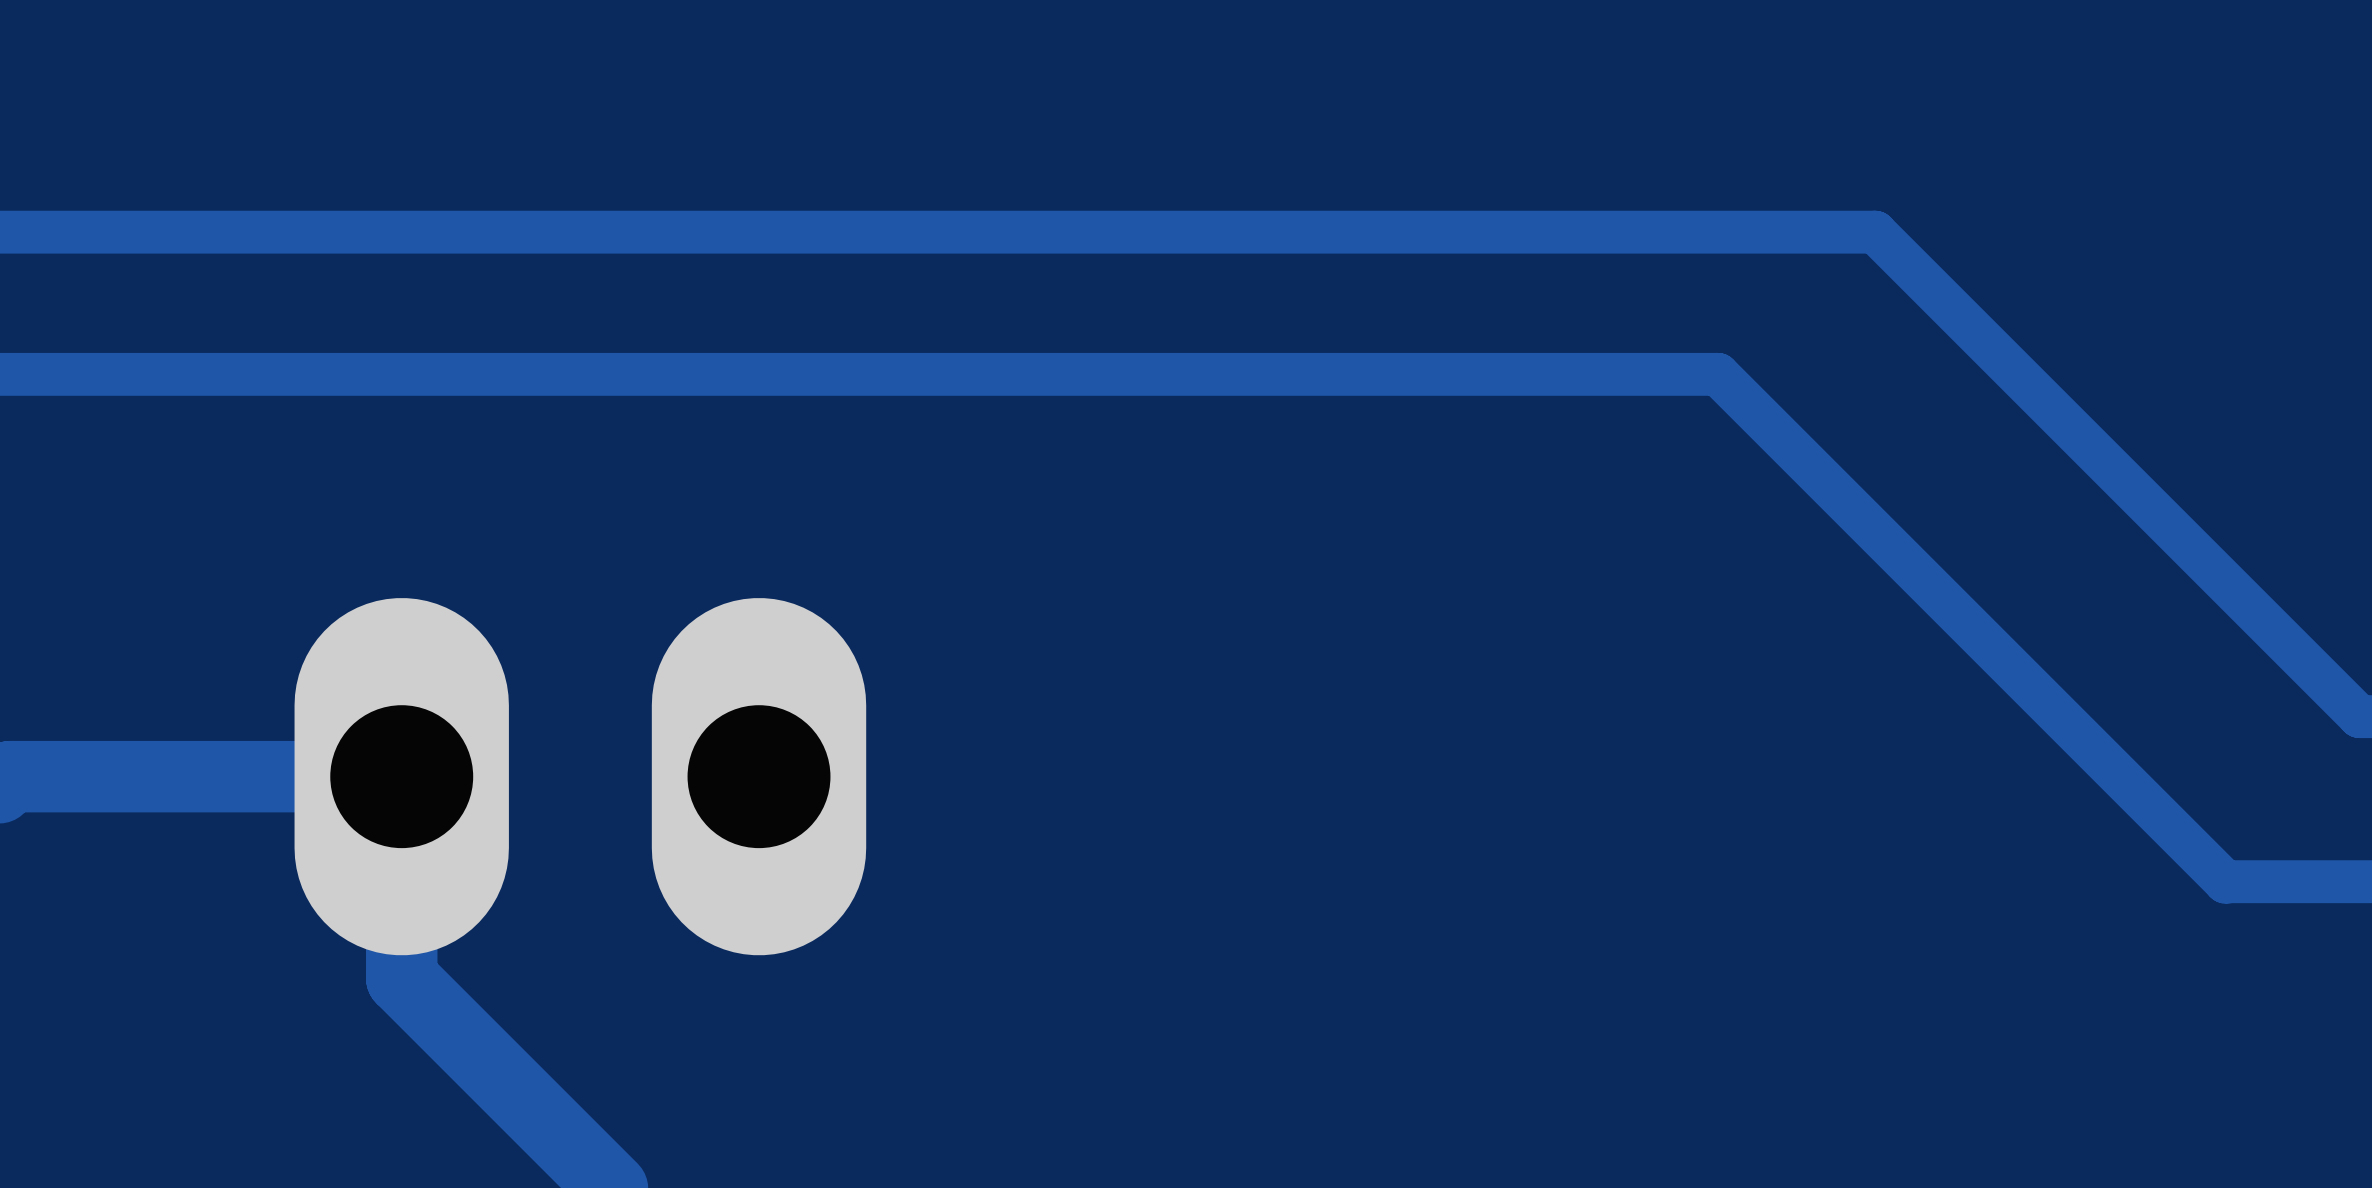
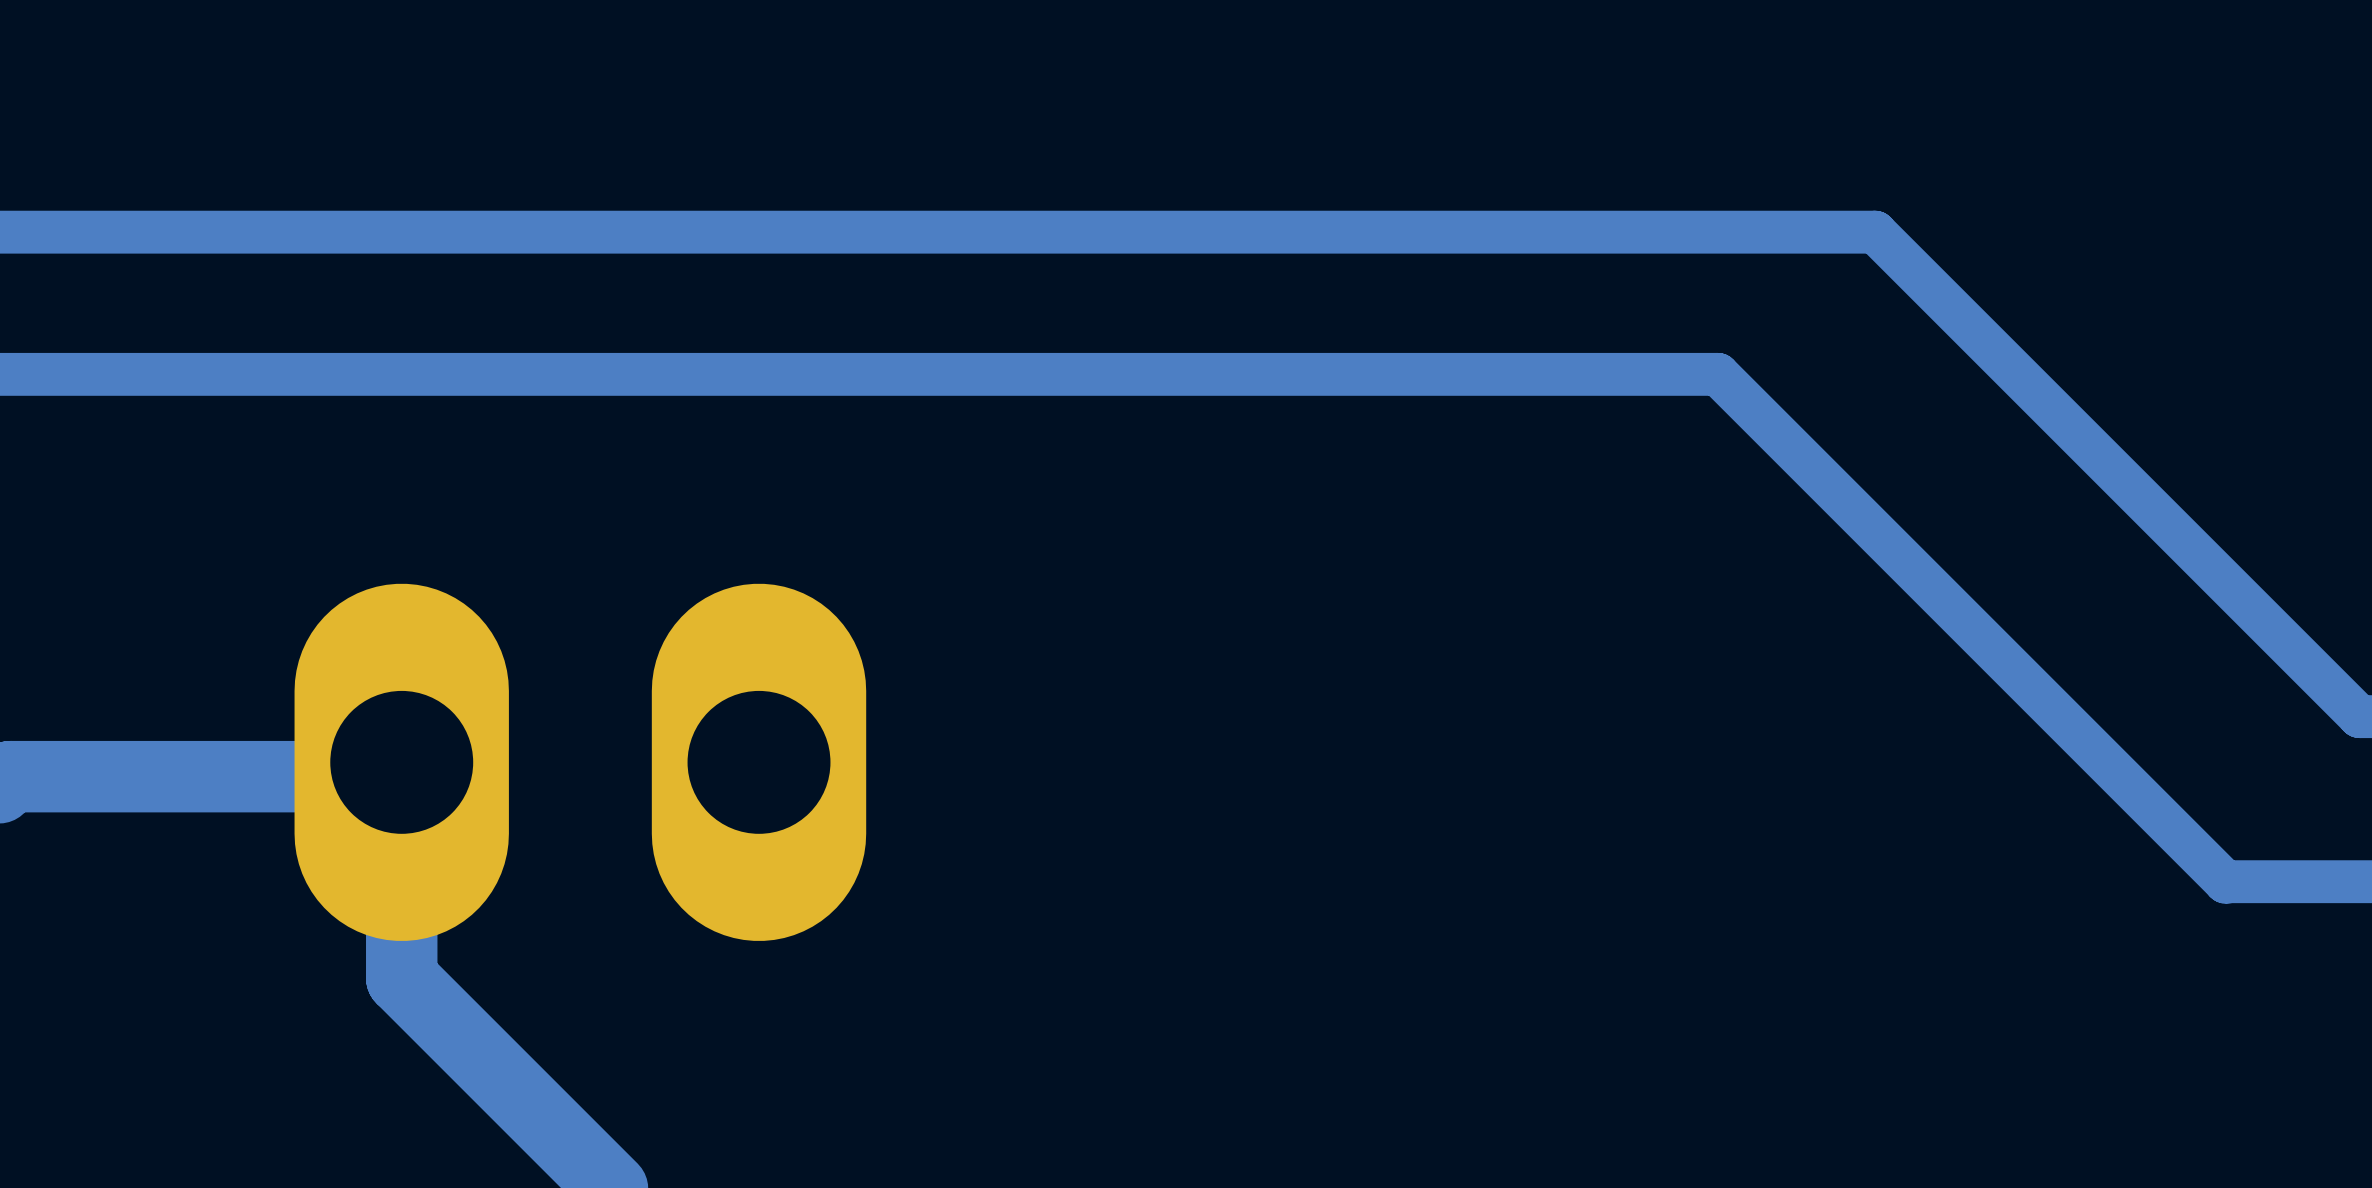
part position: (580, 776) -> (580, 762)

